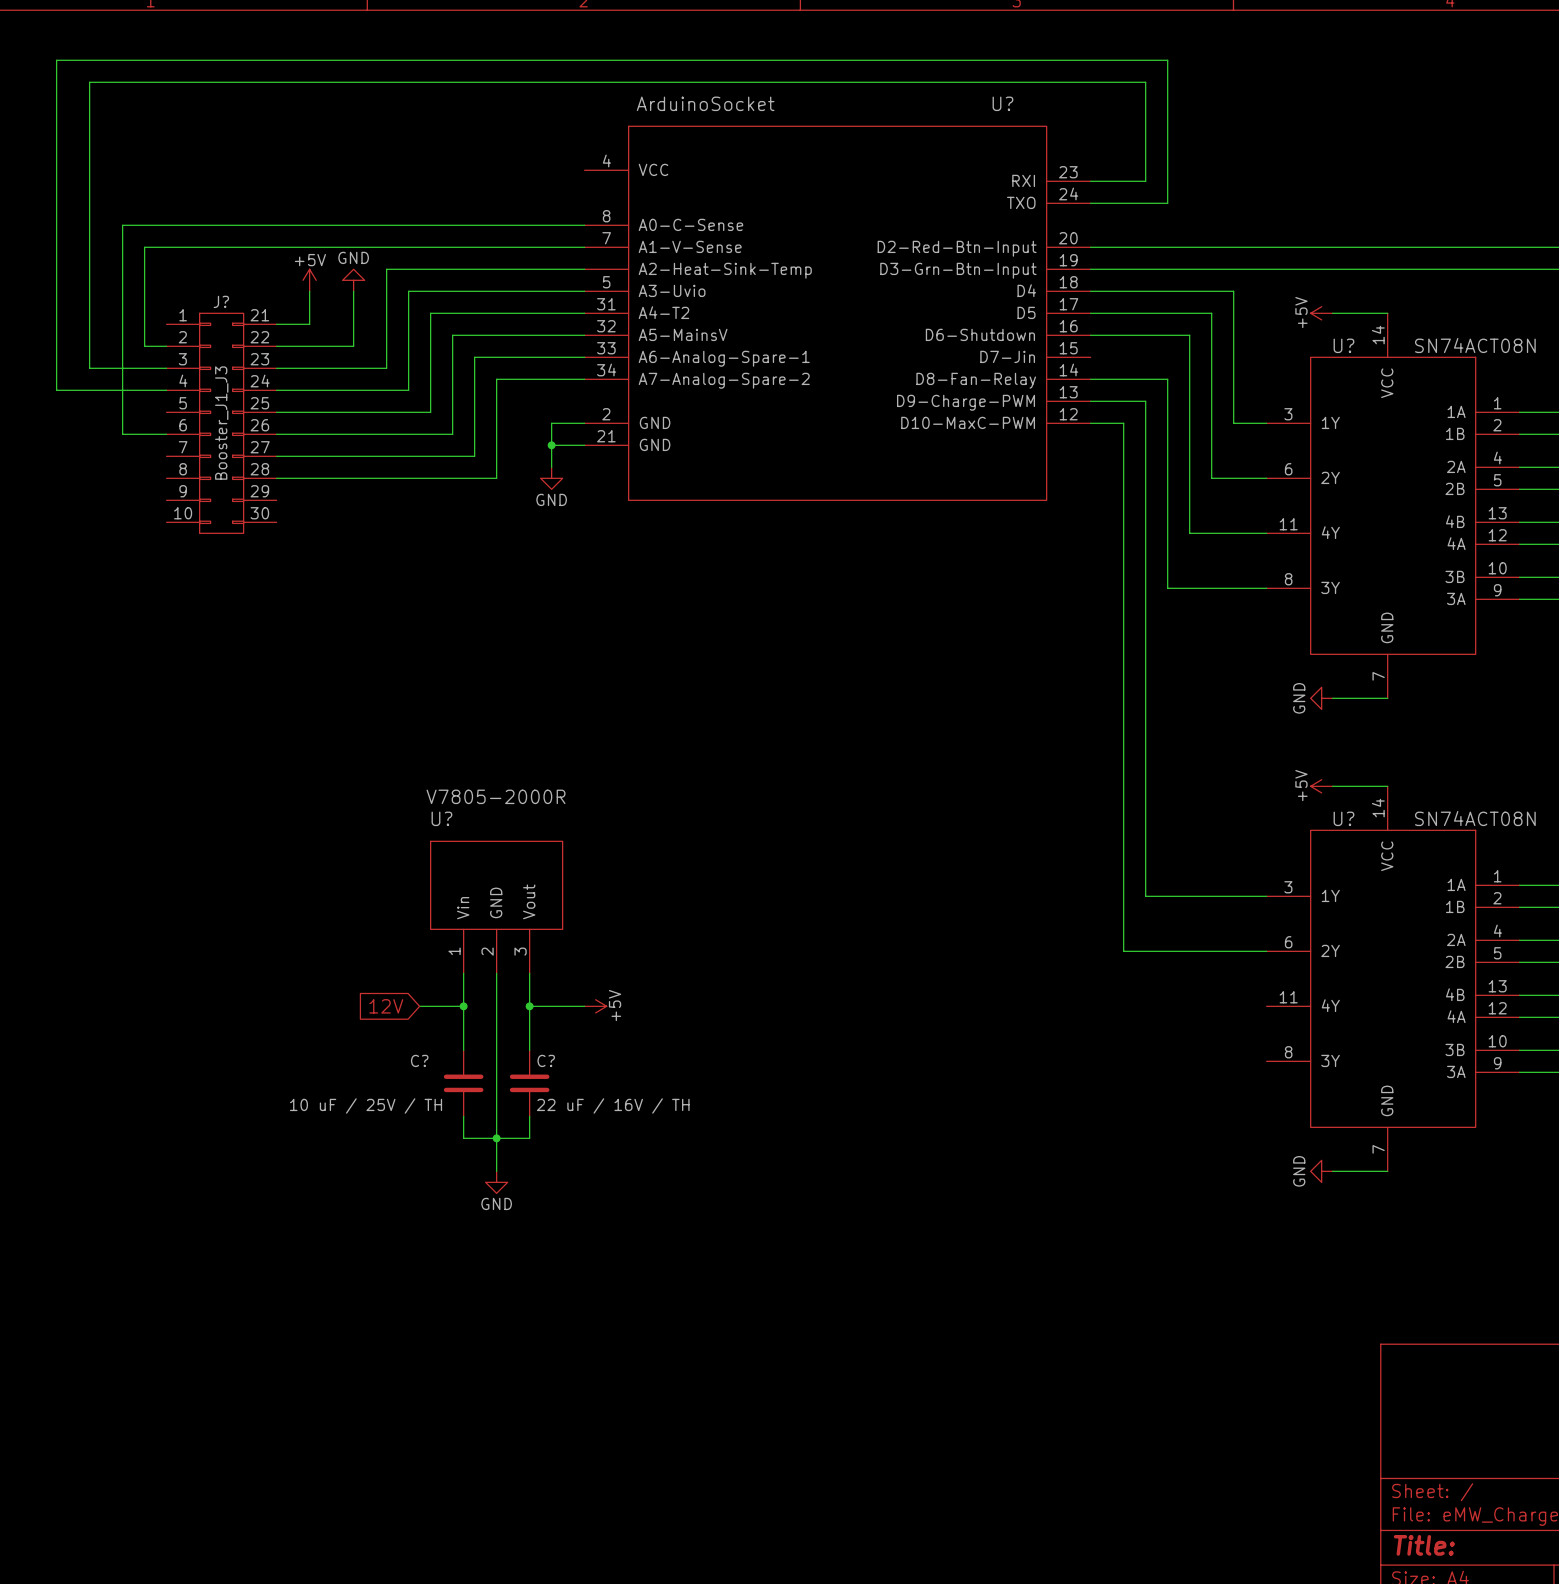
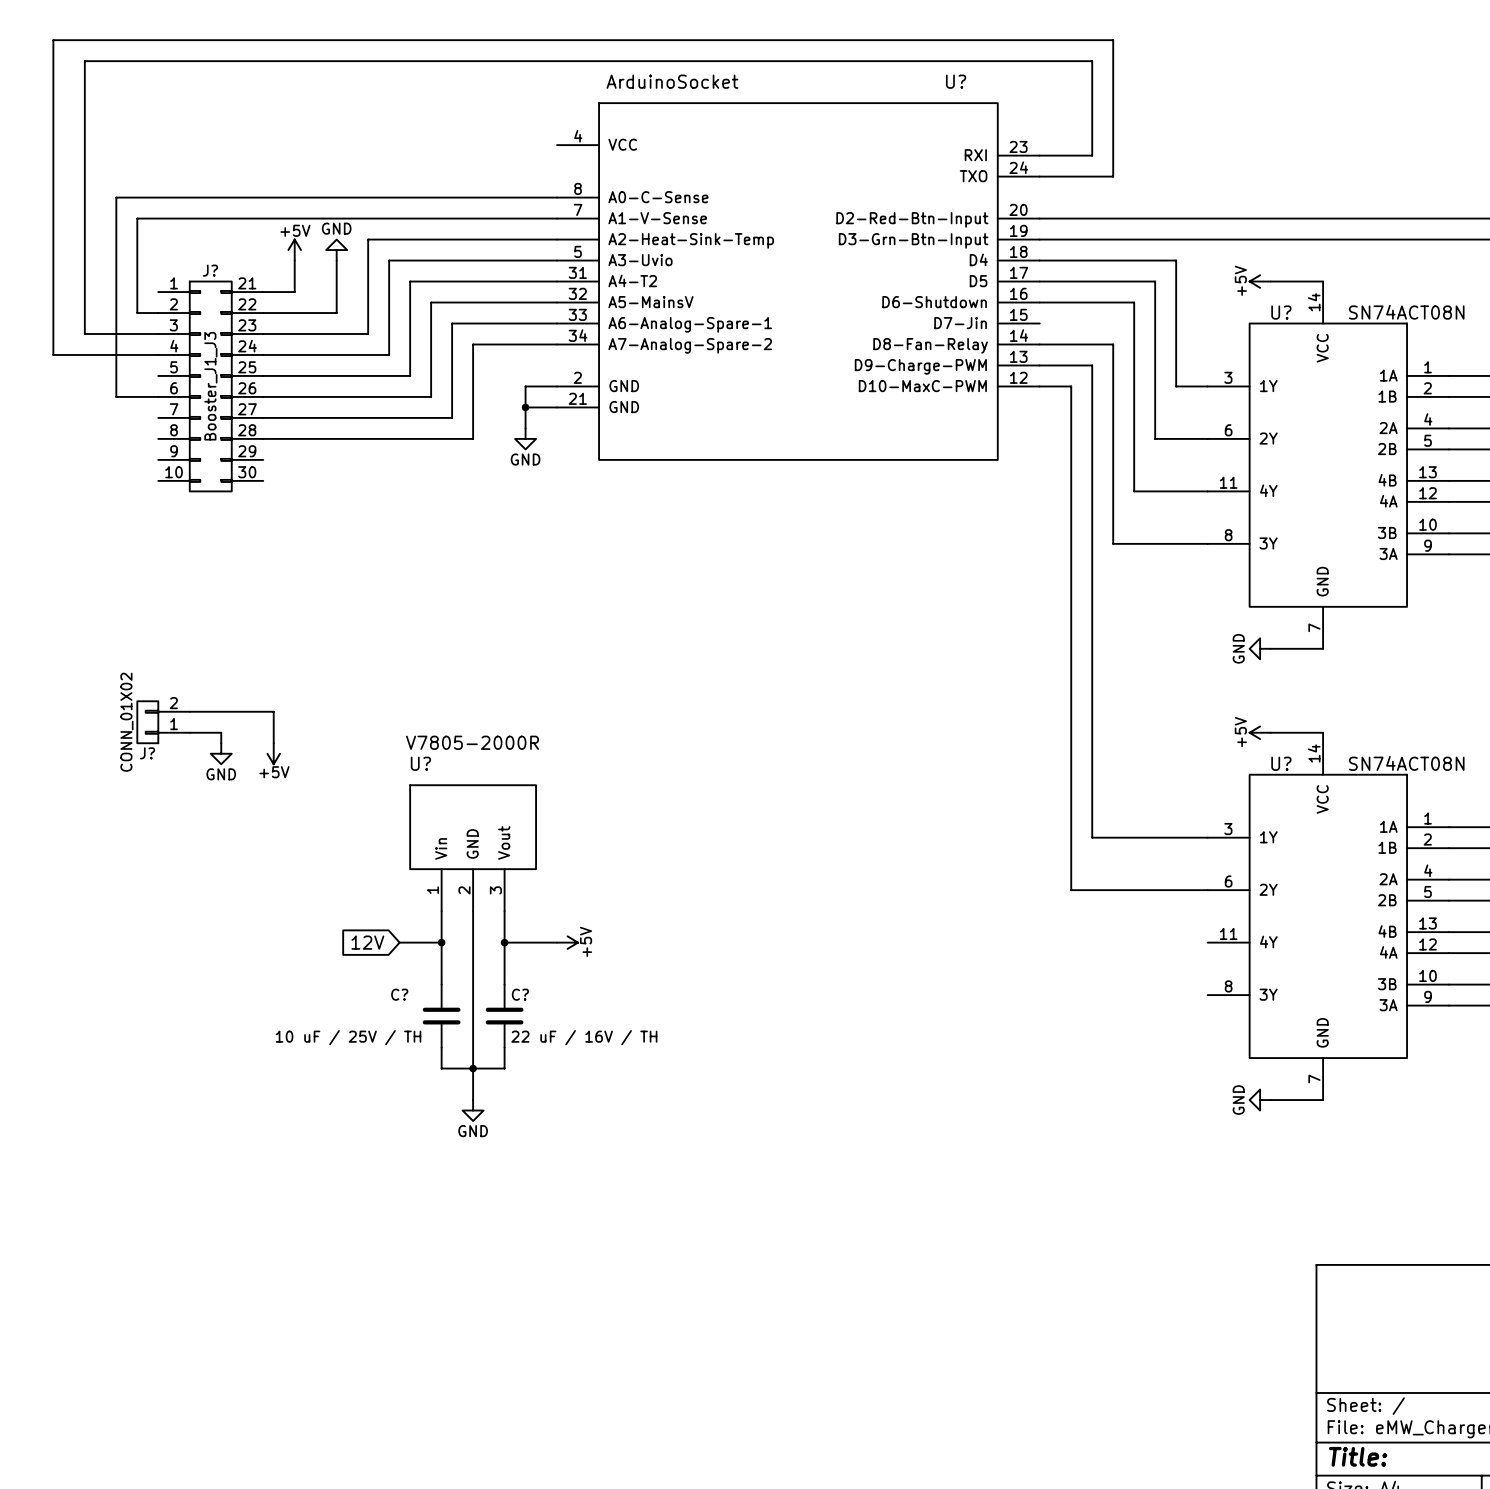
wire: none -> (189, 711) (273, 711) (273, 743)
J?: none -> CONN_01X02 (163, 722)
wire: none -> (189, 732) (221, 732) (221, 743)
power symbol: none -> GND (221, 753)
power symbol: none -> +5V (273, 753)

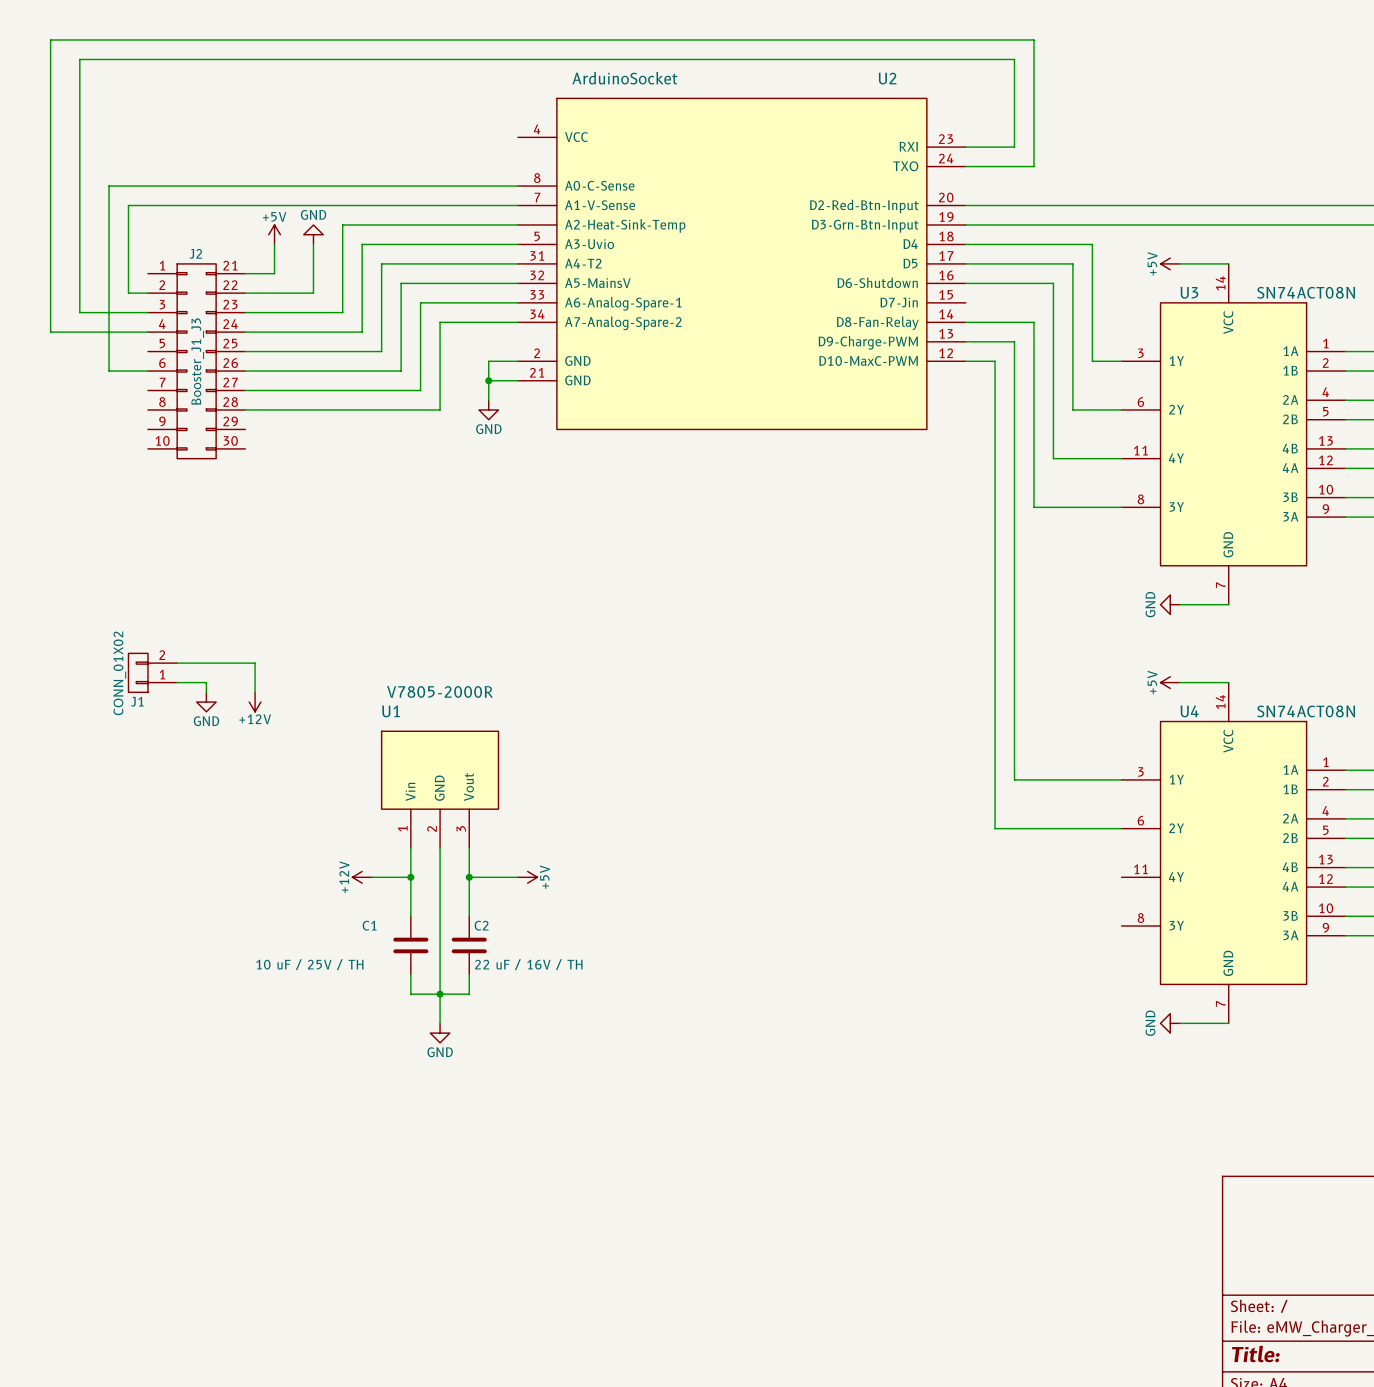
U? name: U? (956, 81) -> U2 (887, 78)
J? name: J? (210, 270) -> J2 (195, 253)
U? name: U? (1281, 312) -> U3 (1189, 292)
J? name: J? (147, 753) -> J1 (137, 701)
power symbol: +5V (273, 753) -> +12V (255, 702)
U? name: U? (420, 763) -> U1 (390, 711)
U? name: U? (1281, 763) -> U4 (1189, 711)
global label: 12V (367, 942) -> none
power symbol: none -> +12V (362, 877)
C? name: C? (399, 994) -> C1 (369, 925)
C? name: C? (520, 994) -> C2 (481, 925)

